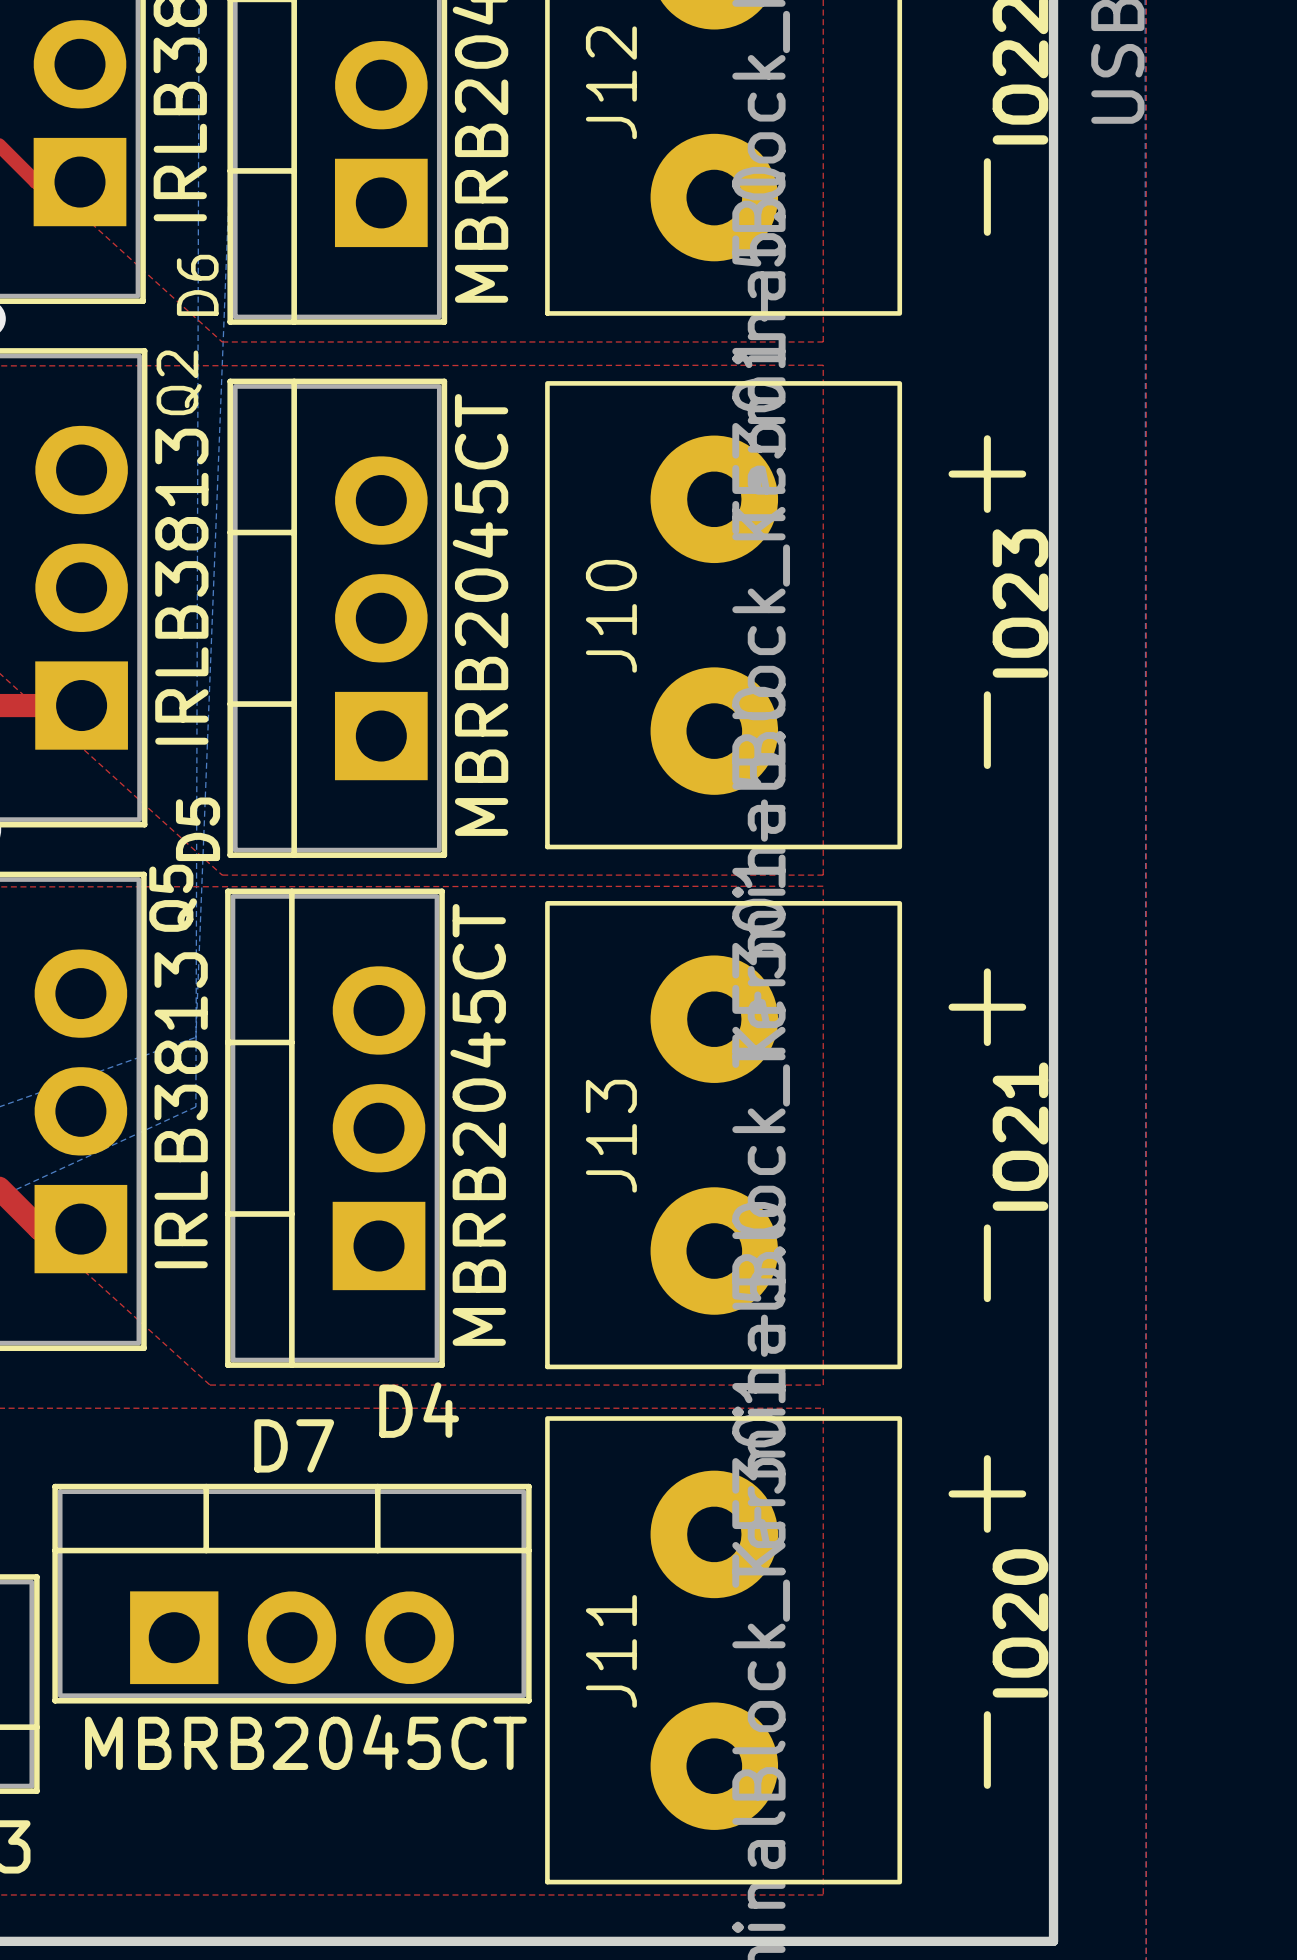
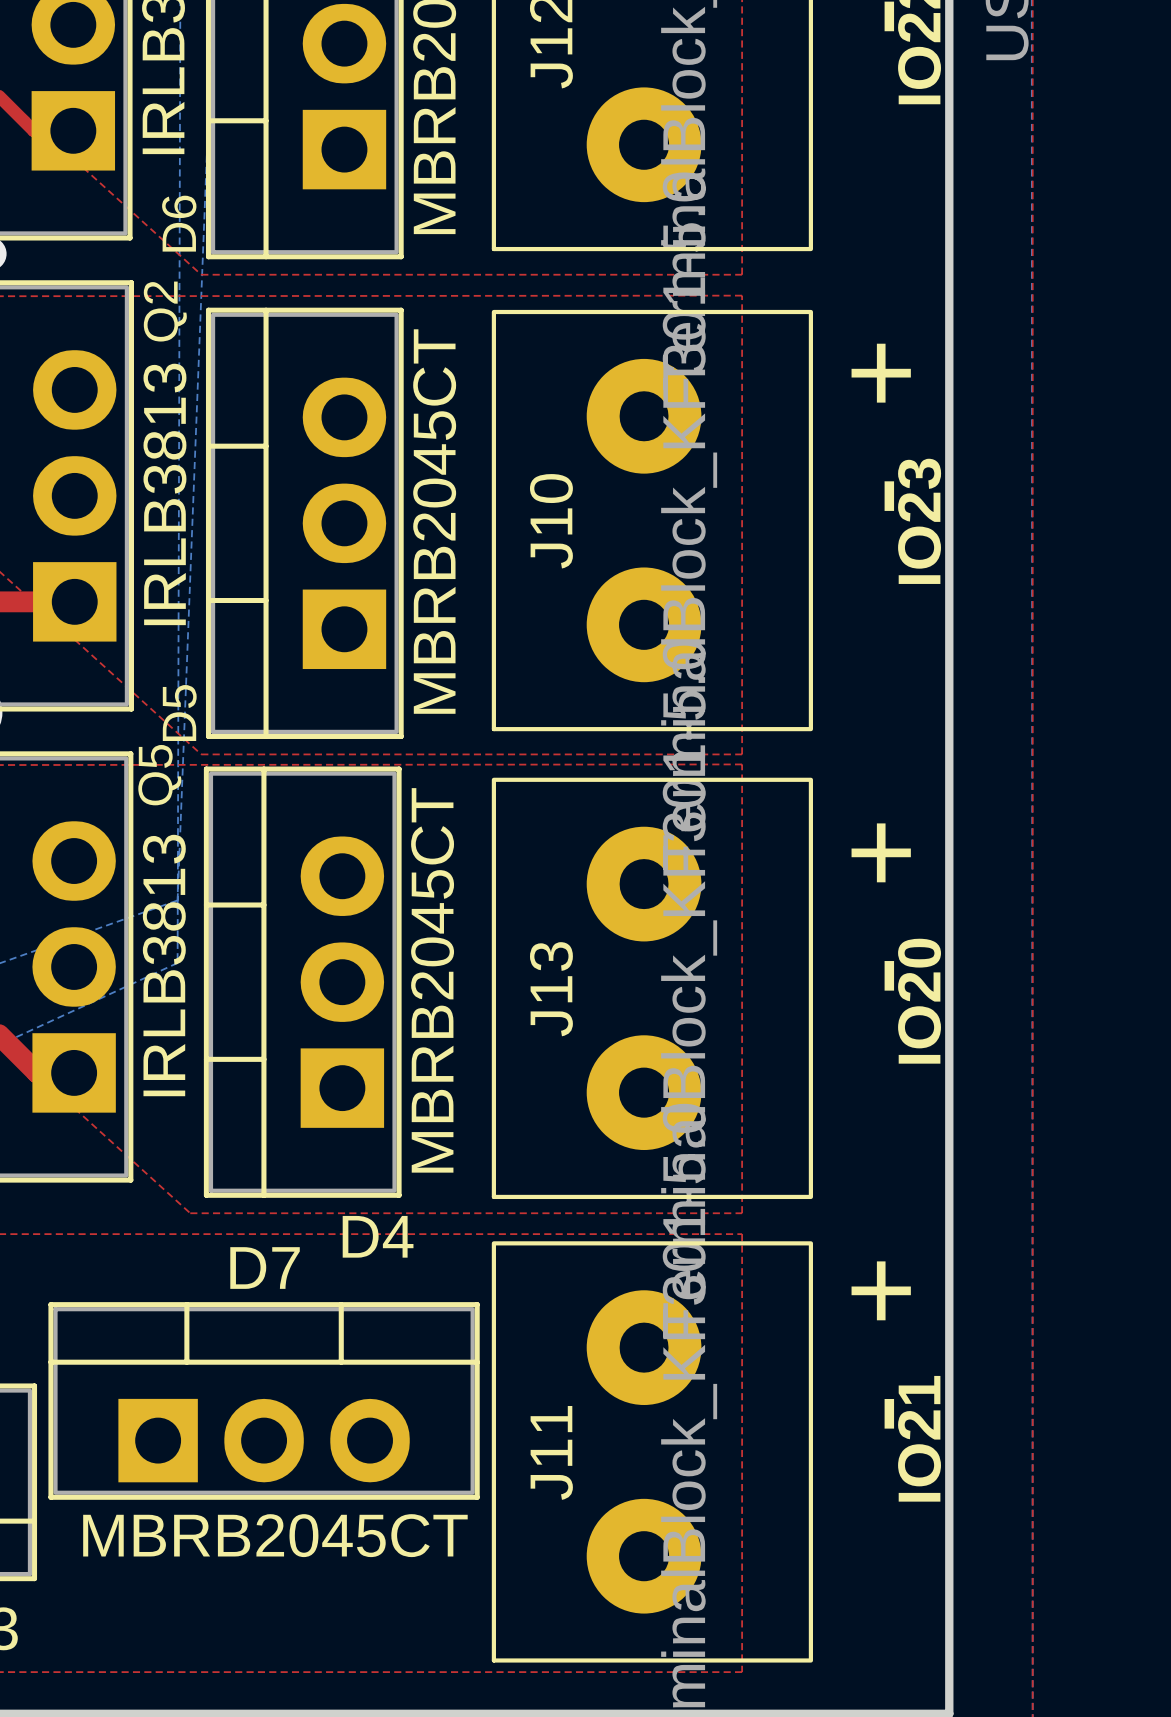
text: IO21 (1020, 1136) -> IO20 (919, 1001)
text: IO20 (1020, 1623) -> IO21 (919, 1438)

